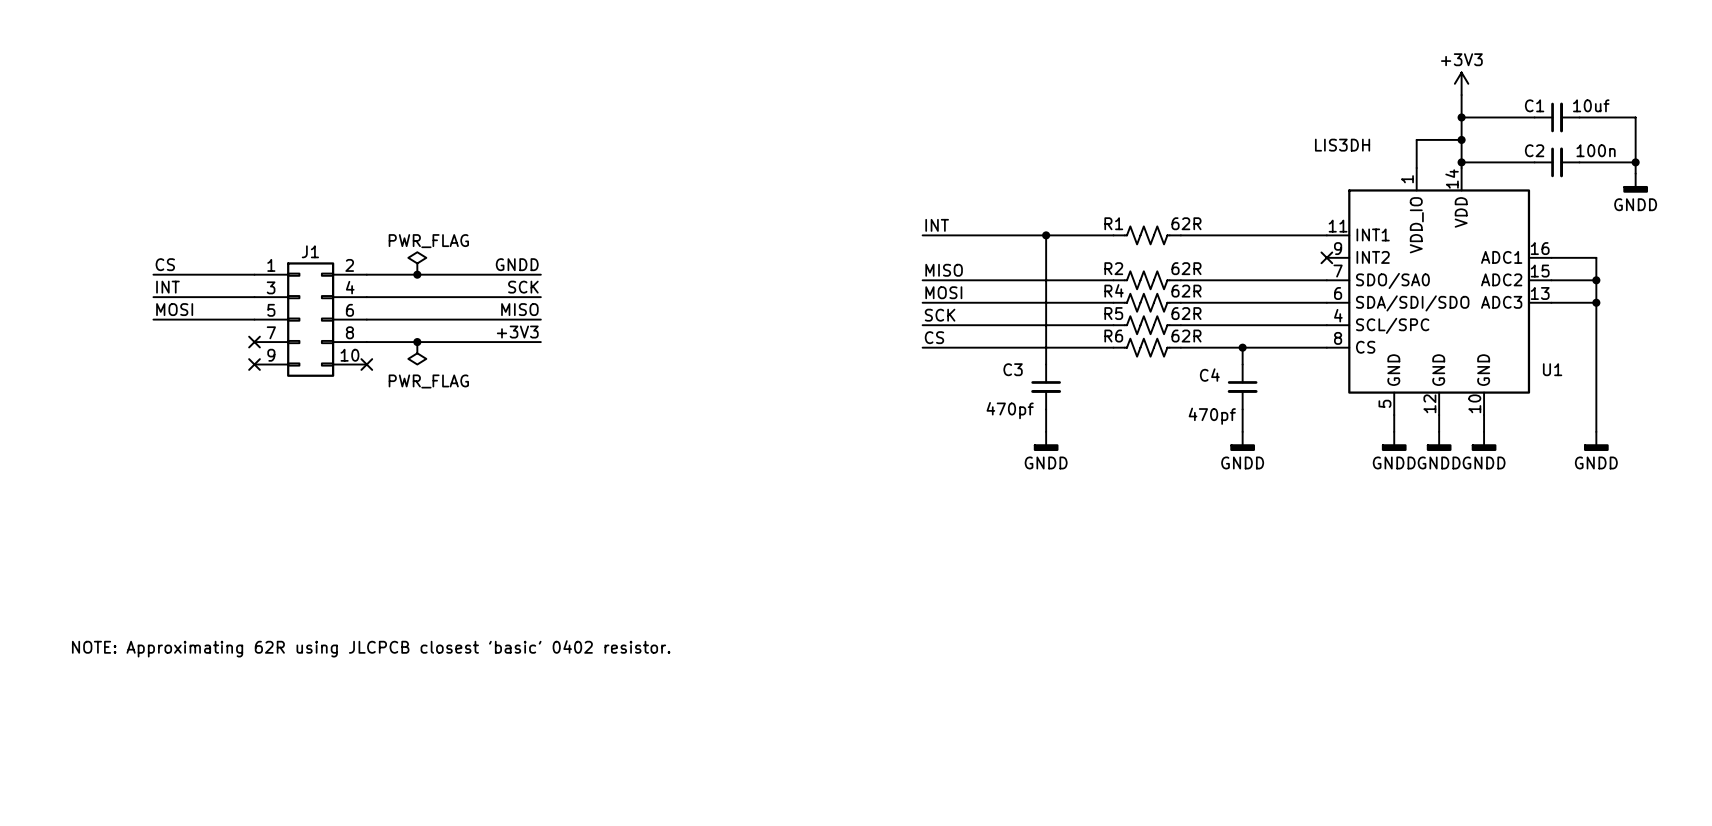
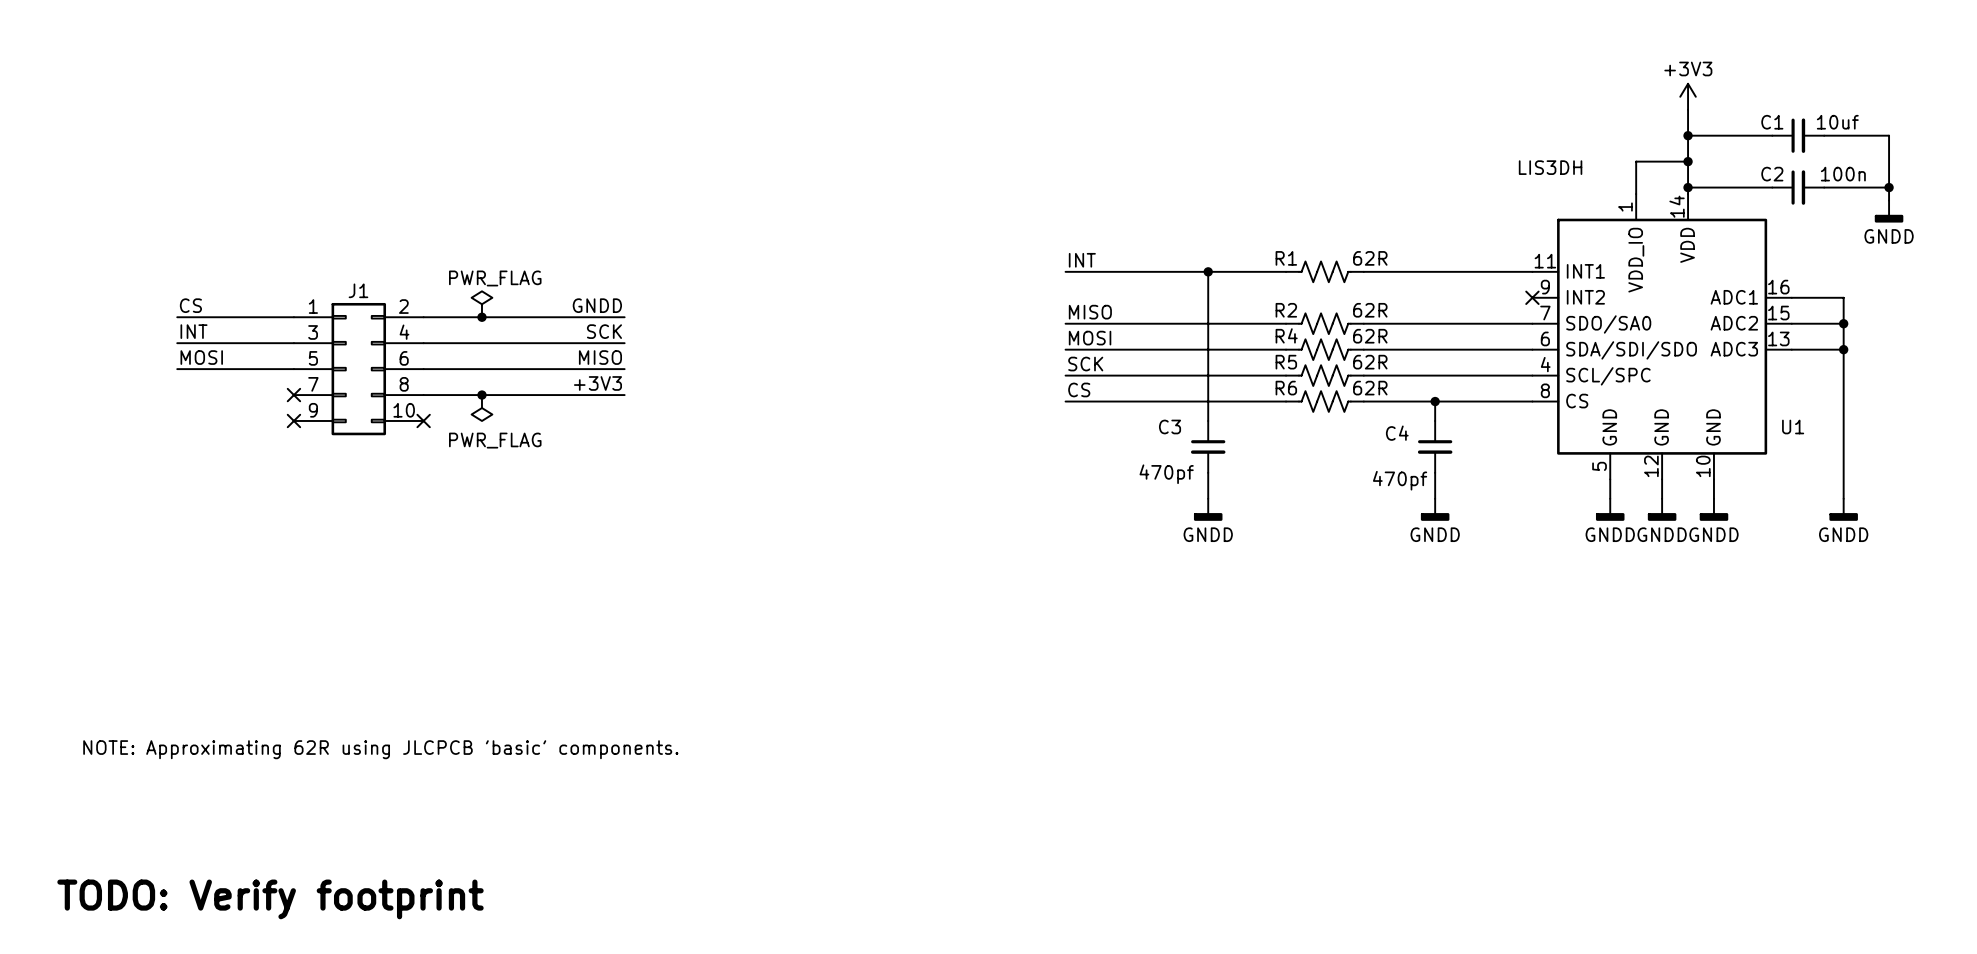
text: NOTE: Approximating 62R using JLCPCB closest 'basic' 0402 resistor. (371, 648) -> NOTE: Approximating 62R using JLCPCB 'basic' components. (380, 749)
text: none -> TODO: Verify footprint (270, 899)

